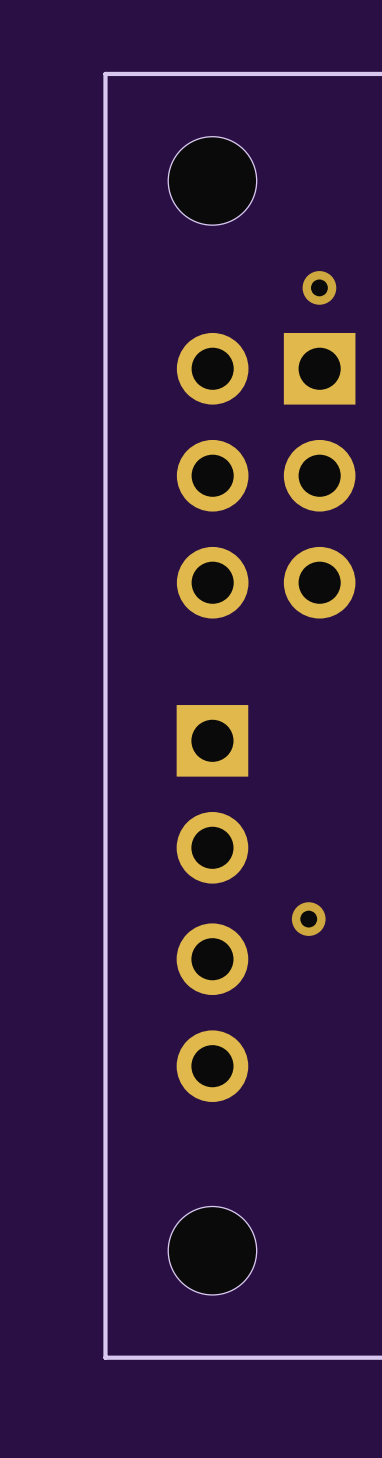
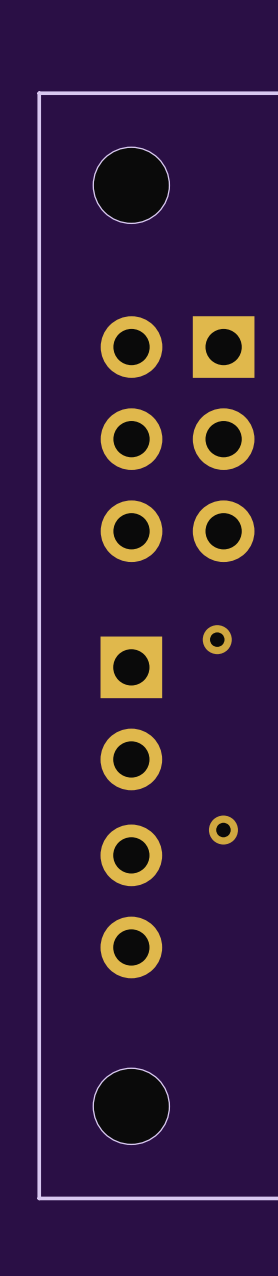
via: (319, 287) -> none
via: none -> (217, 639)
via position: (308, 919) -> (223, 830)

